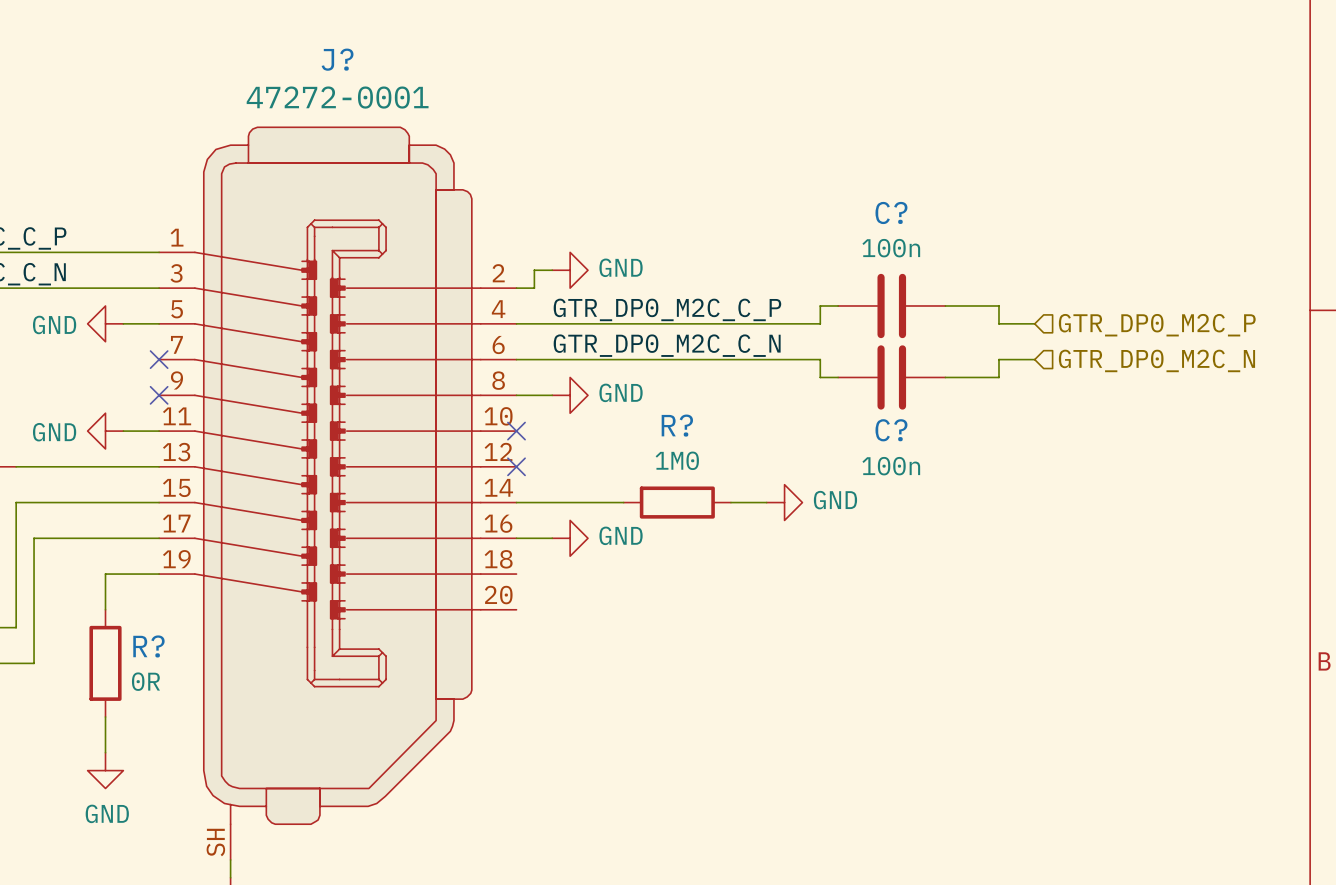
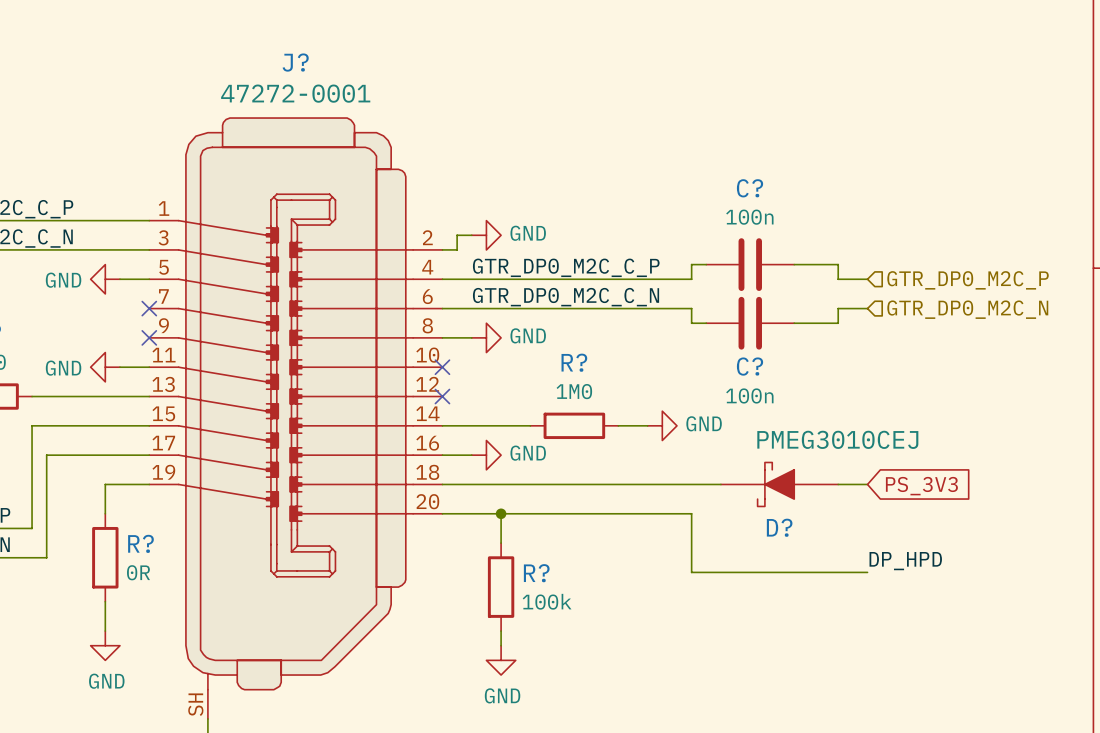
wire: none -> (442, 484) (720, 484)
D?: none -> PMEG3010CEJ (779, 484)
wire: none -> (838, 484) (867, 484)
global label: none -> PS_3V3 (921, 486)
wire: none -> (442, 513) (691, 513) (691, 572) (867, 572)
wire: none -> (501, 513) (501, 543)
junction: none -> (501, 513)
label: none -> DP_HPD (905, 561)
R?: none -> (501, 587)
wire: none -> (501, 631) (501, 645)
power symbol: none -> GND (501, 660)

